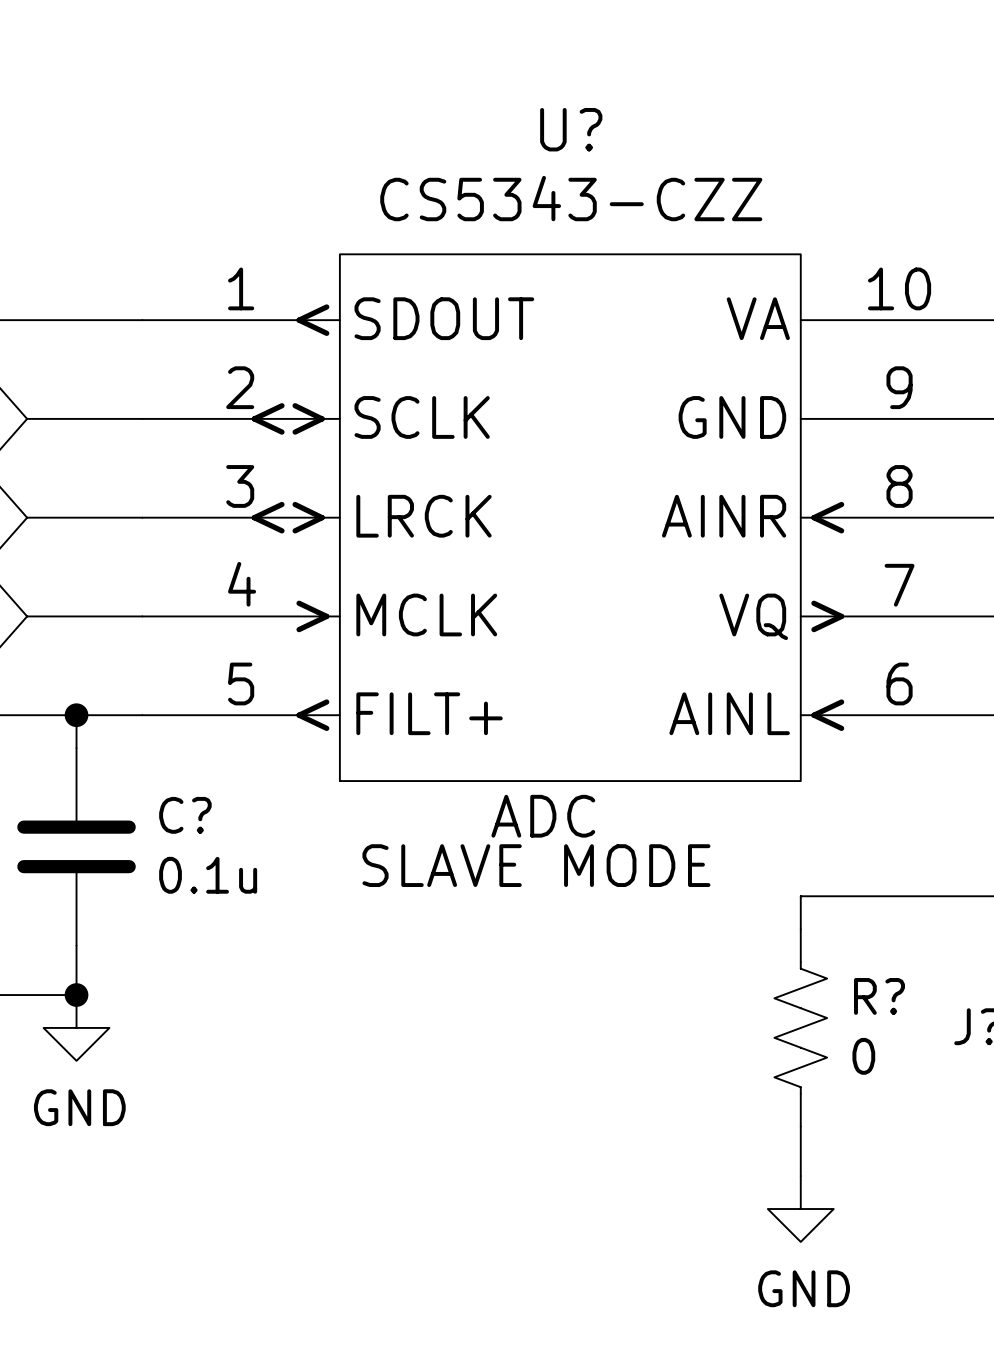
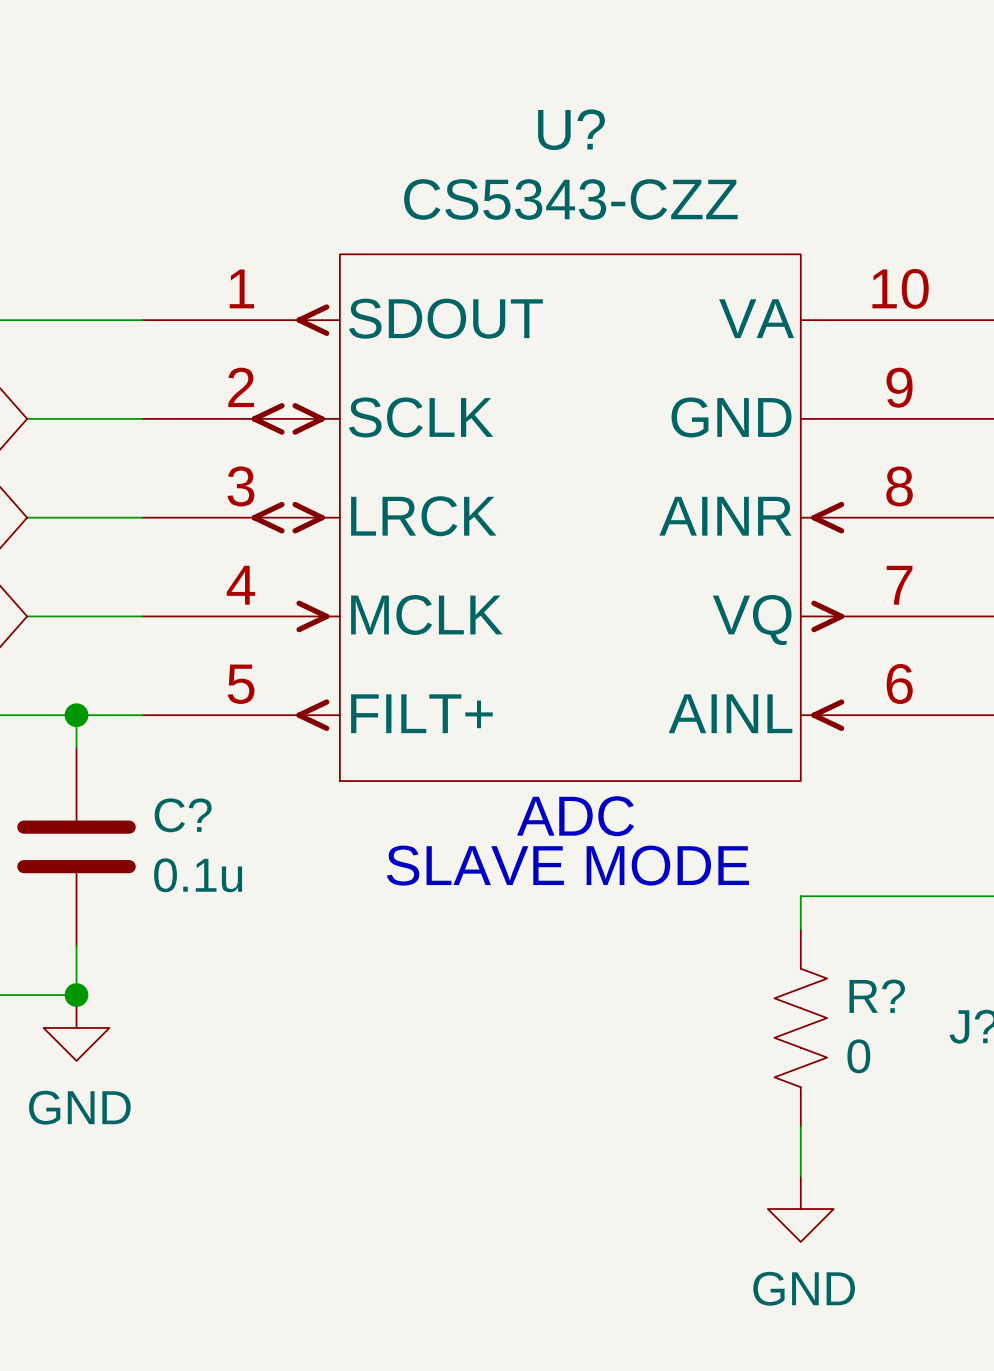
text position: ADC (543, 816) -> ADC (575, 816)
text position: SLAVE MODE (536, 865) -> SLAVE MODE (567, 865)

